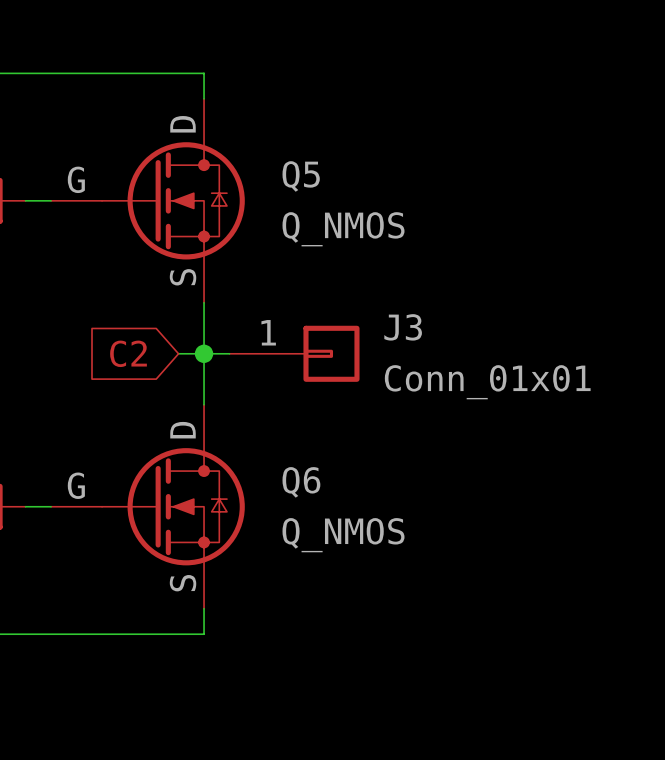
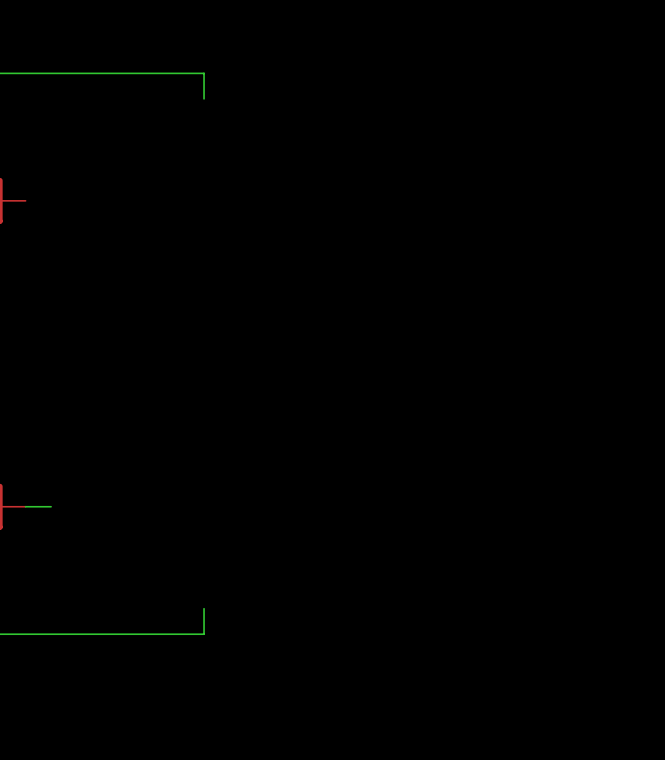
wire: (25, 200) (51, 200) -> none
Q5: Q_NMOS (147, 200) -> none
wire: (204, 302) (204, 404) -> none
global label: C2 (128, 353) -> none
wire: (178, 353) (229, 353) -> none
junction: (204, 353) -> none
J3: Conn_01x01 (294, 353) -> none
Q6: Q_NMOS (147, 506) -> none

